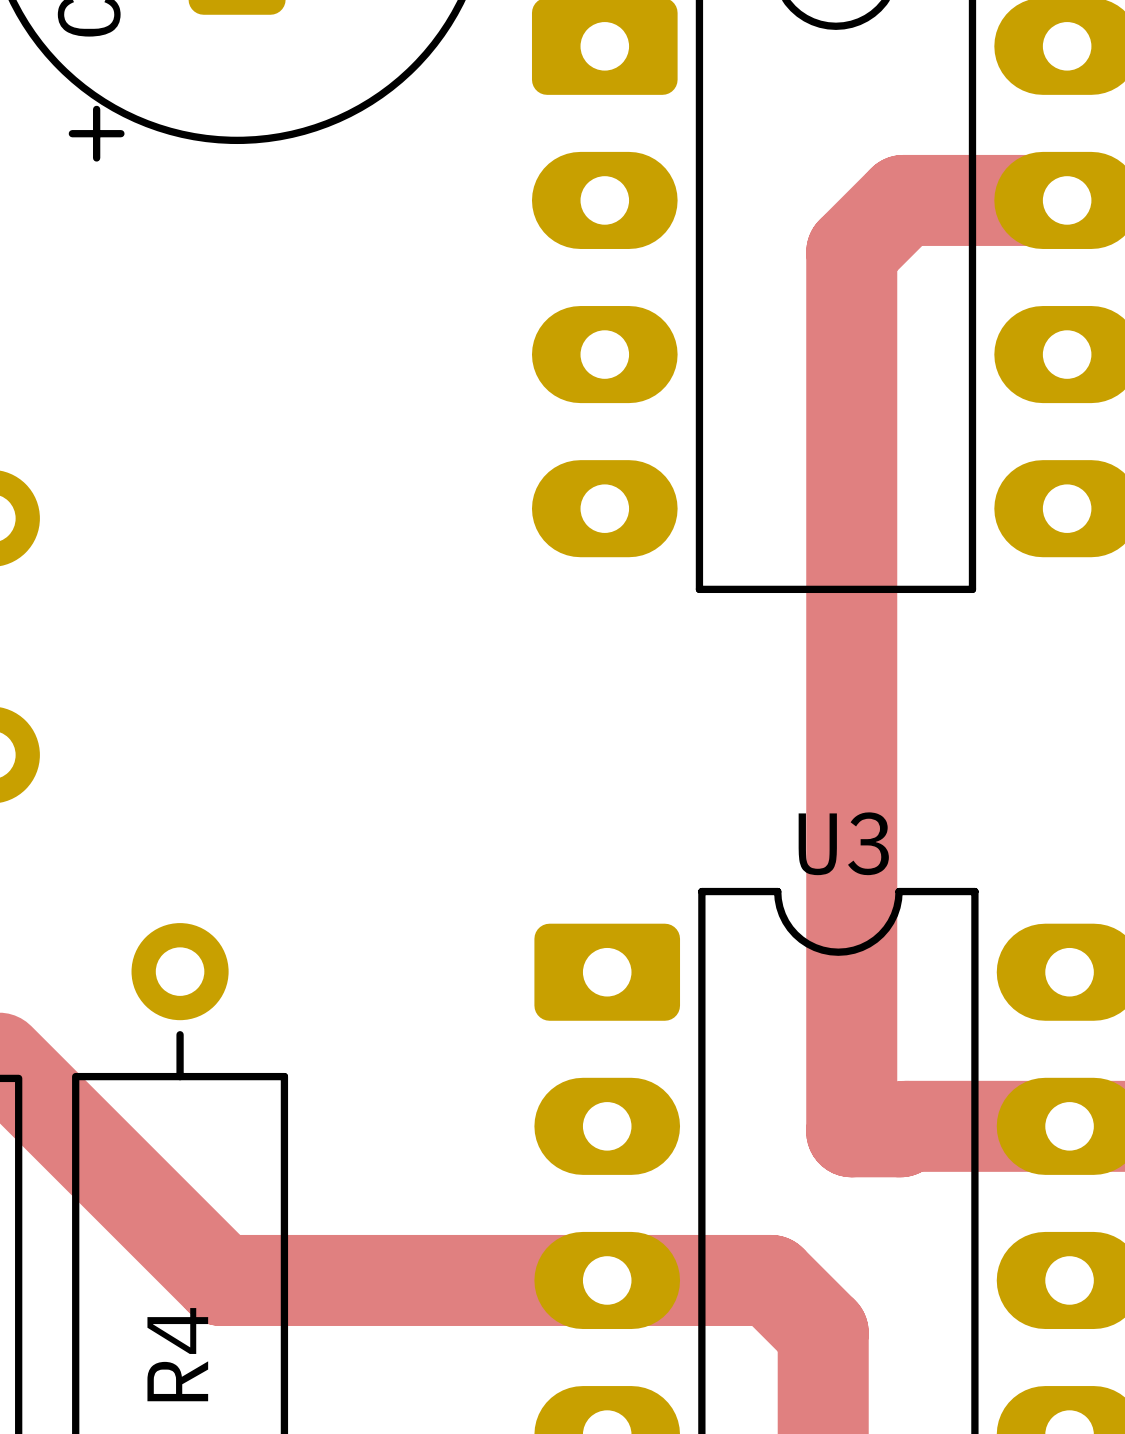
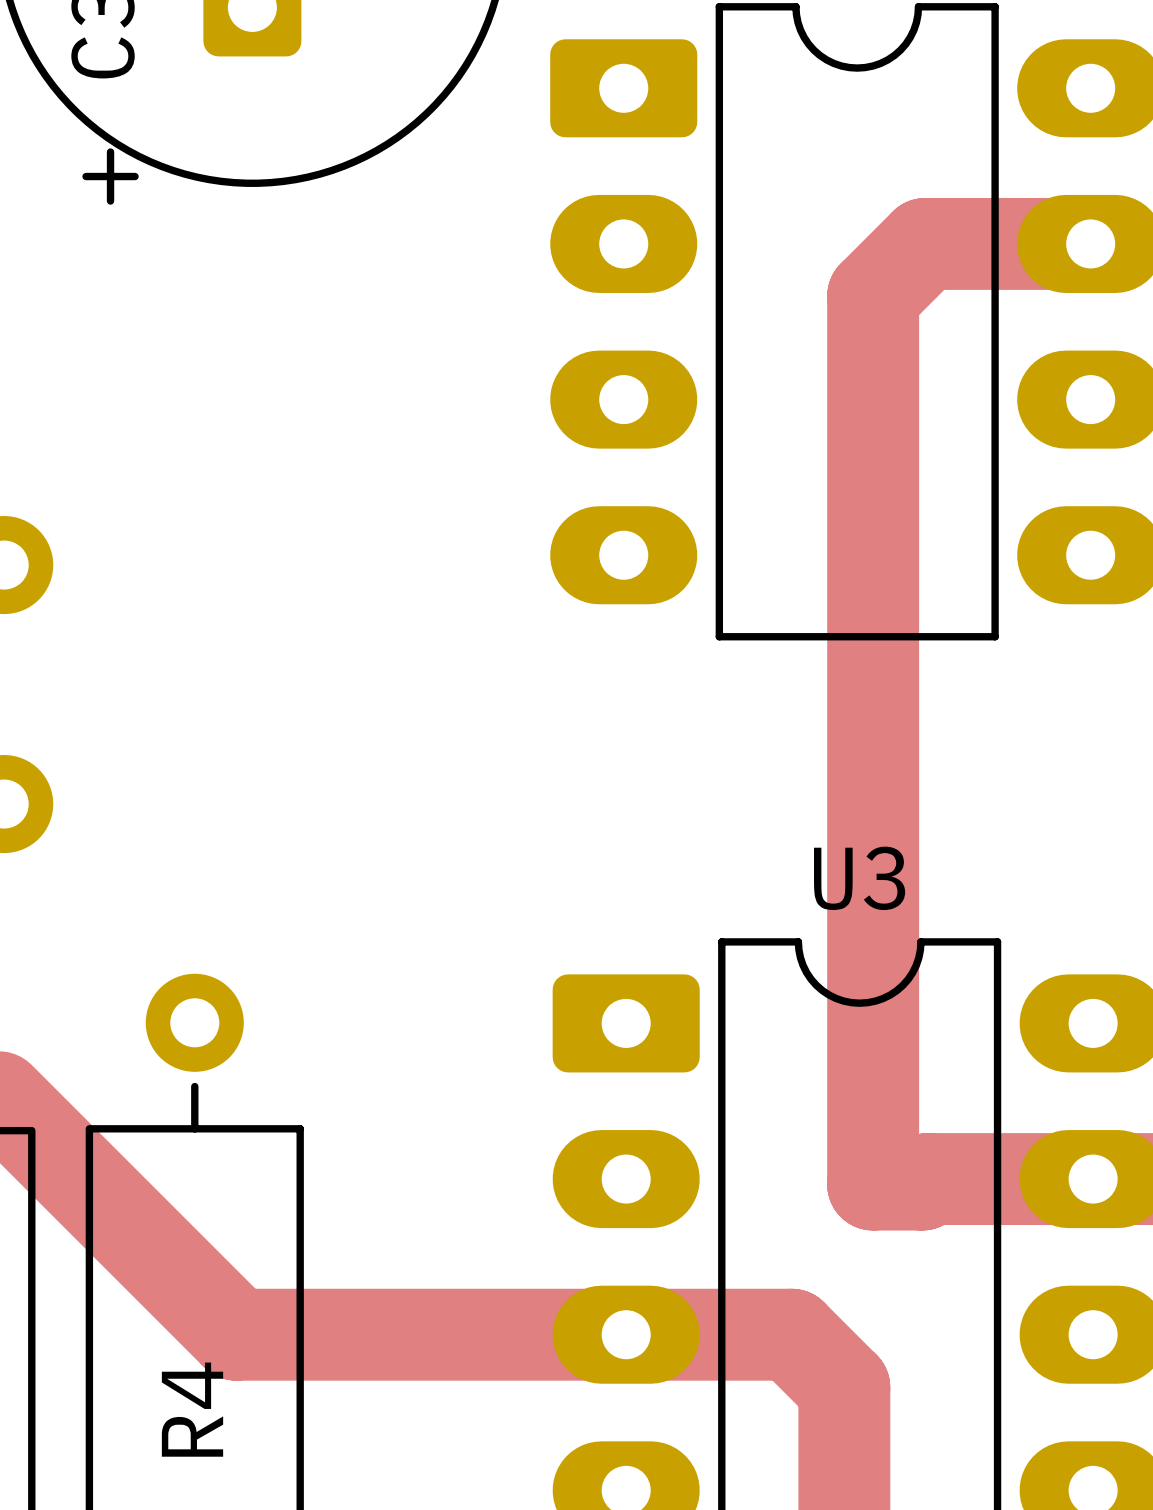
U3 name position: U3 (843, 843) -> U3 (859, 878)

